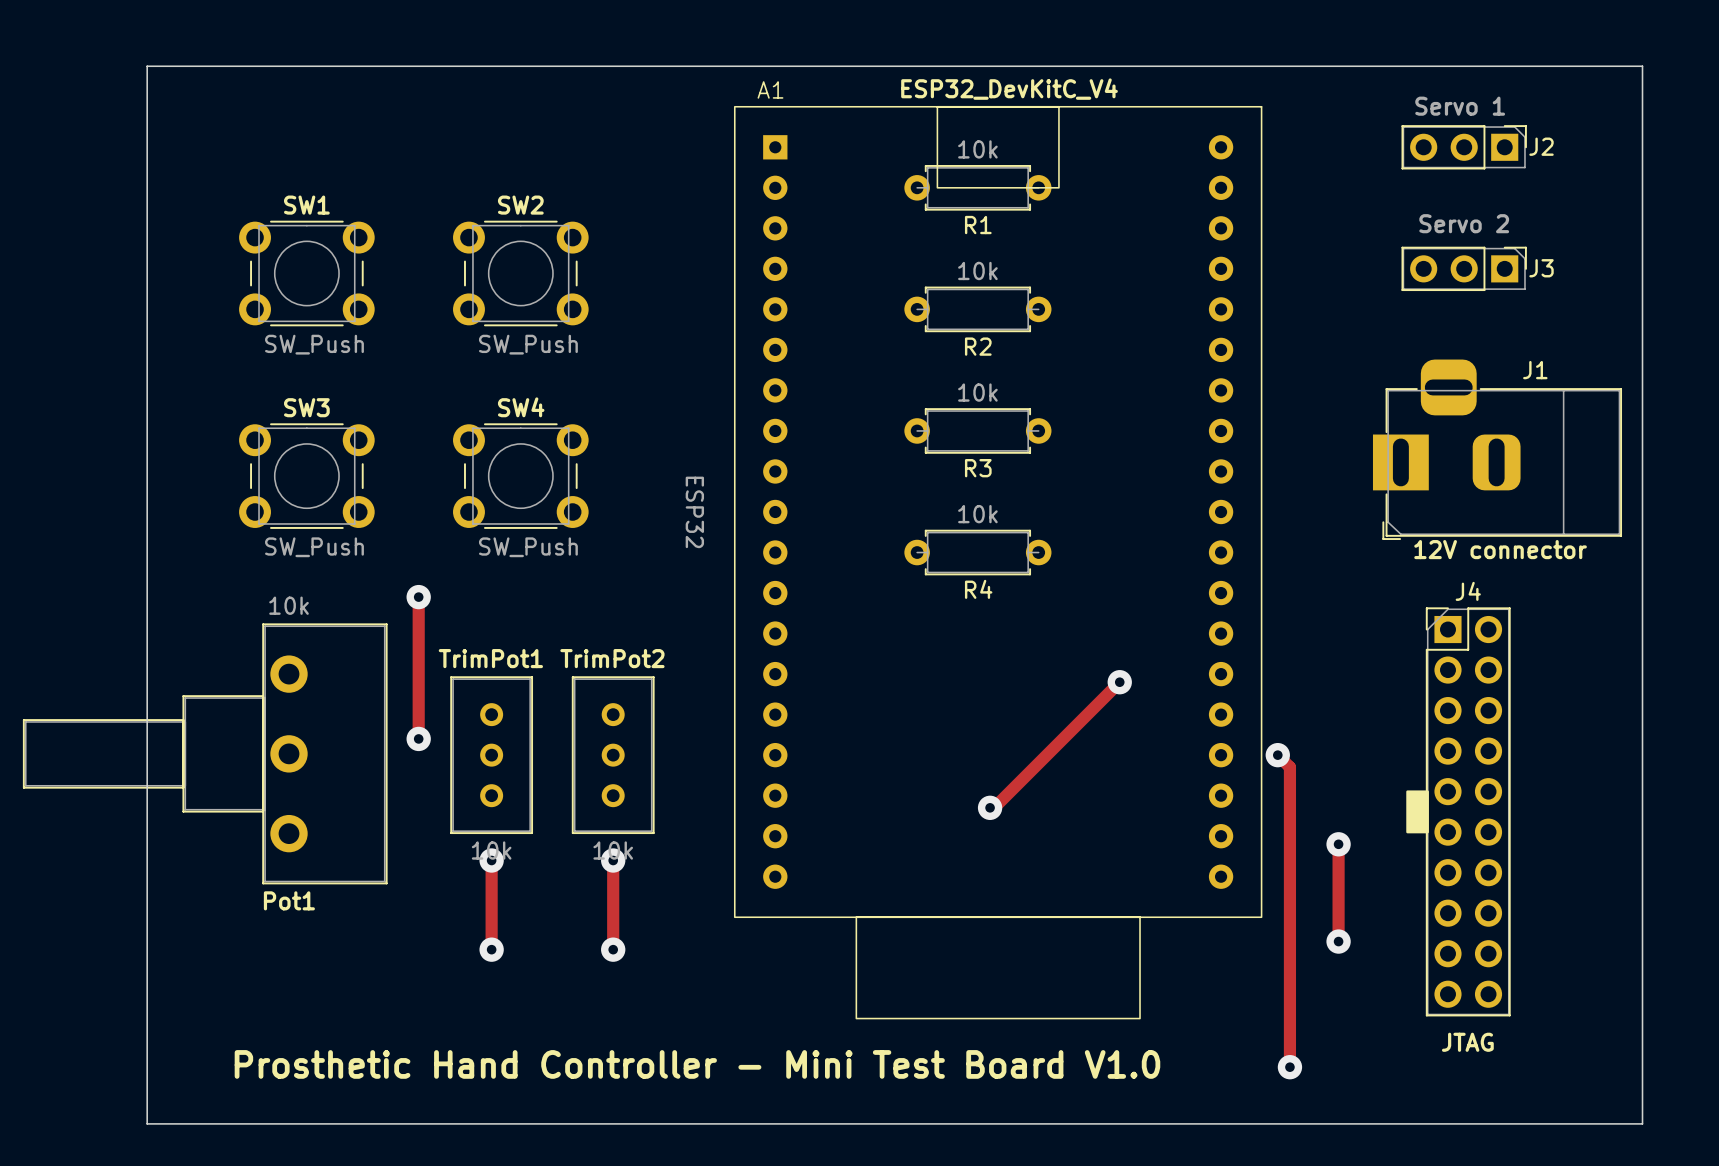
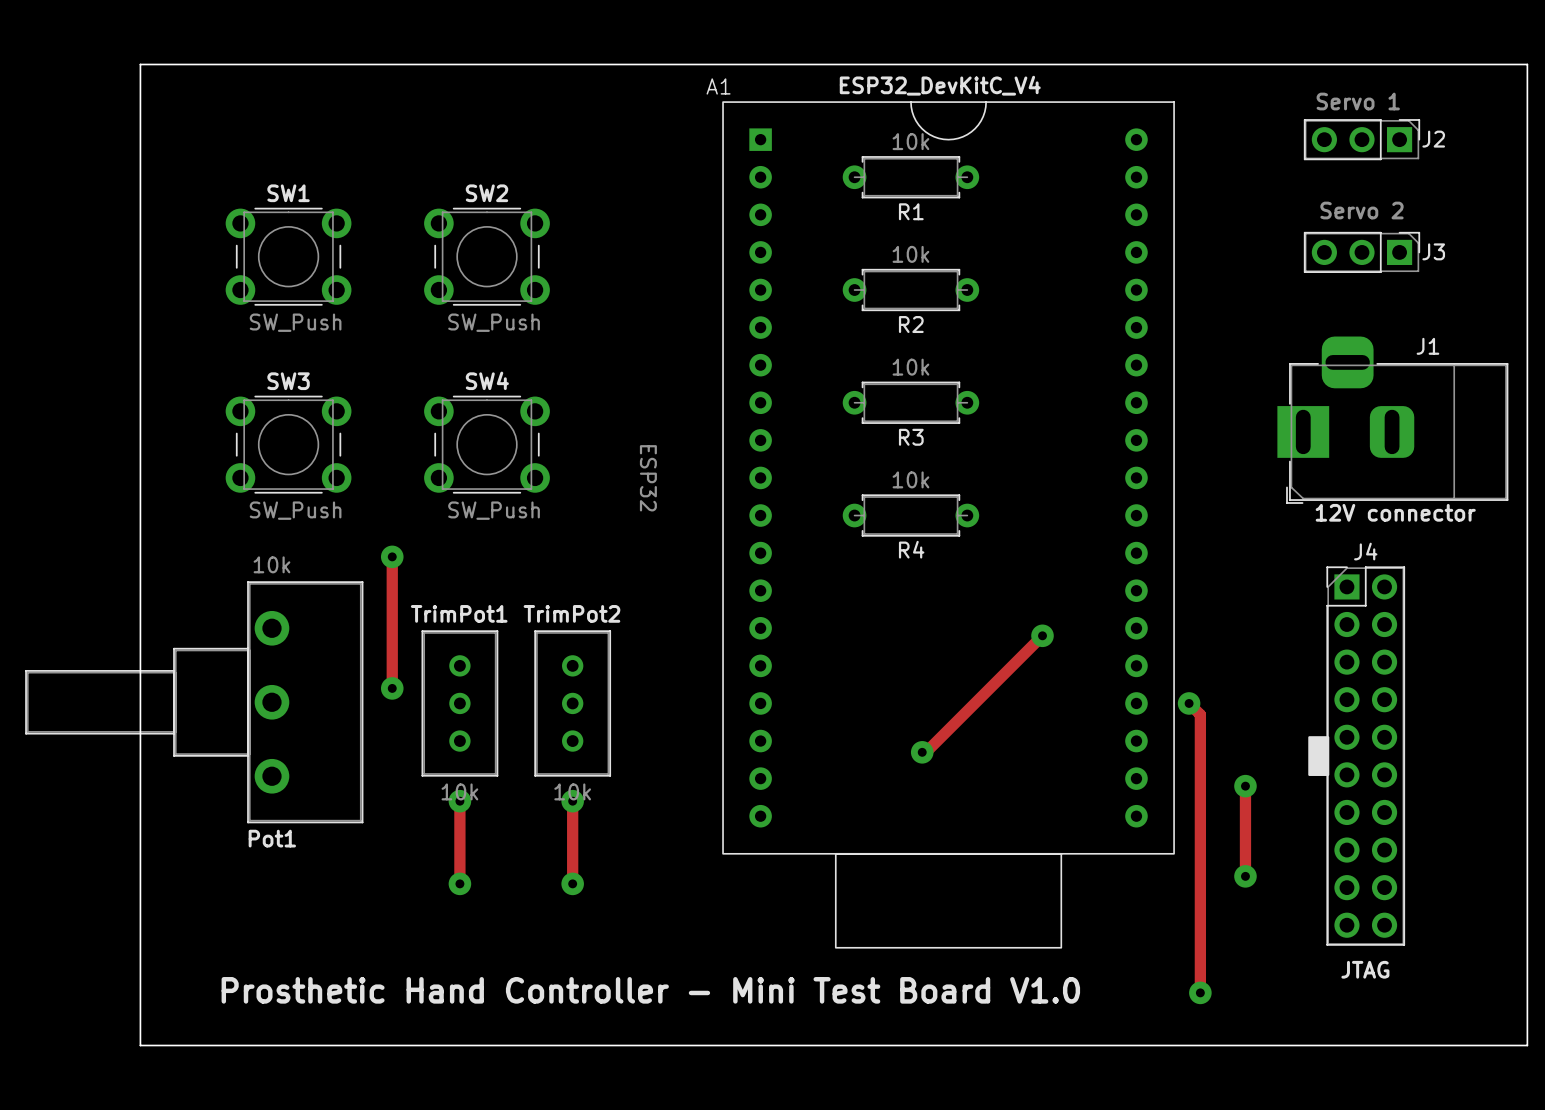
A1 footprint: [733, 105, 1263, 1020] -> [722, 101, 1175, 949]

